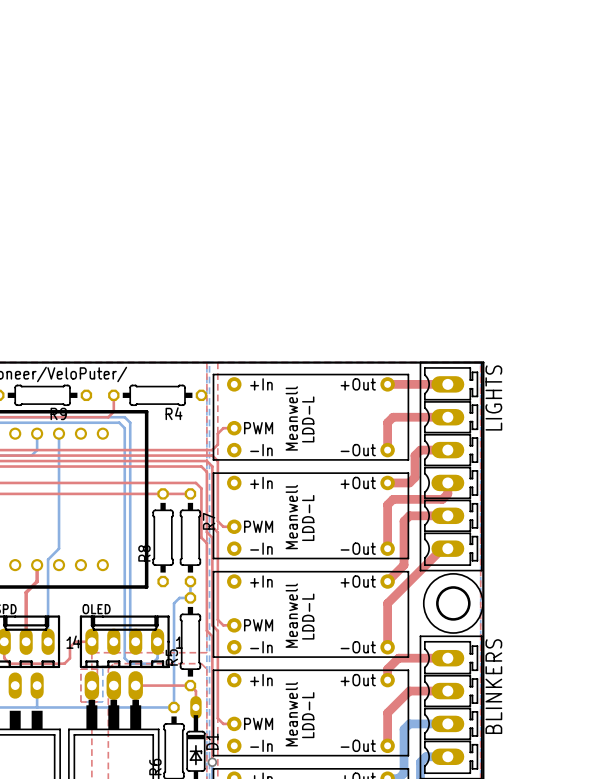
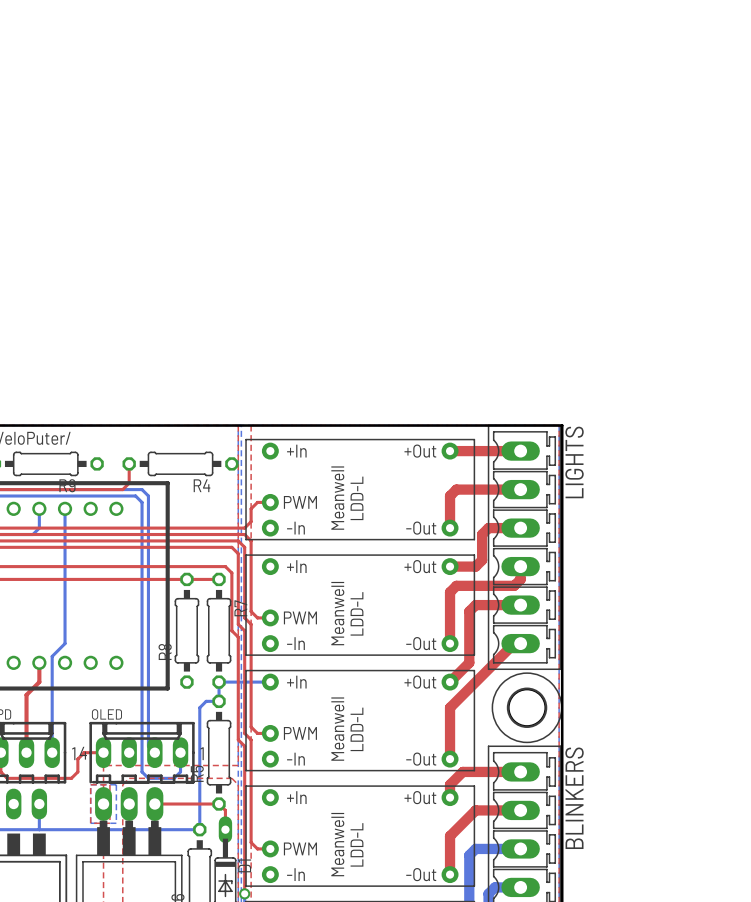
bottom track: none -> (219, 682) (270, 682)

